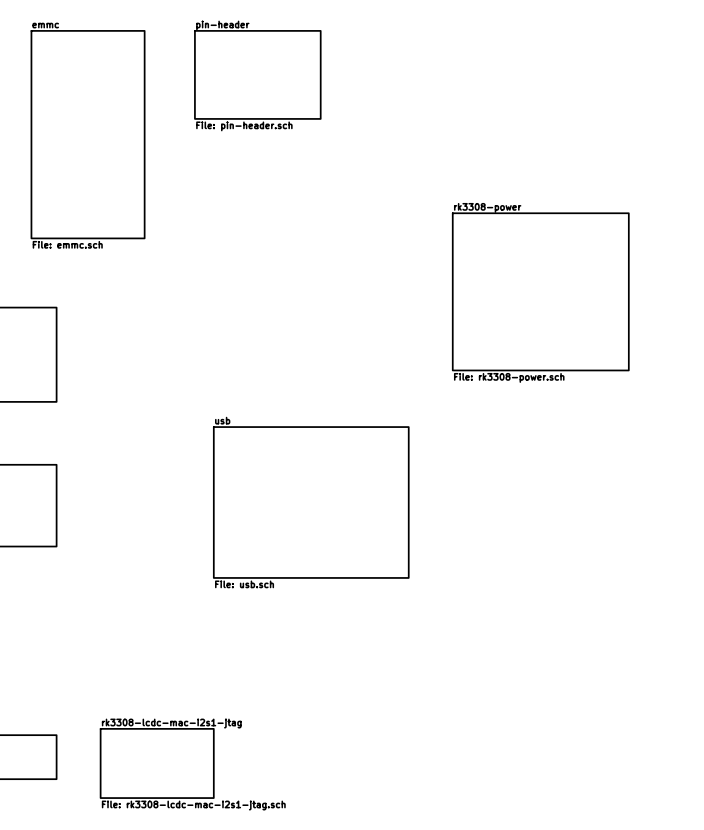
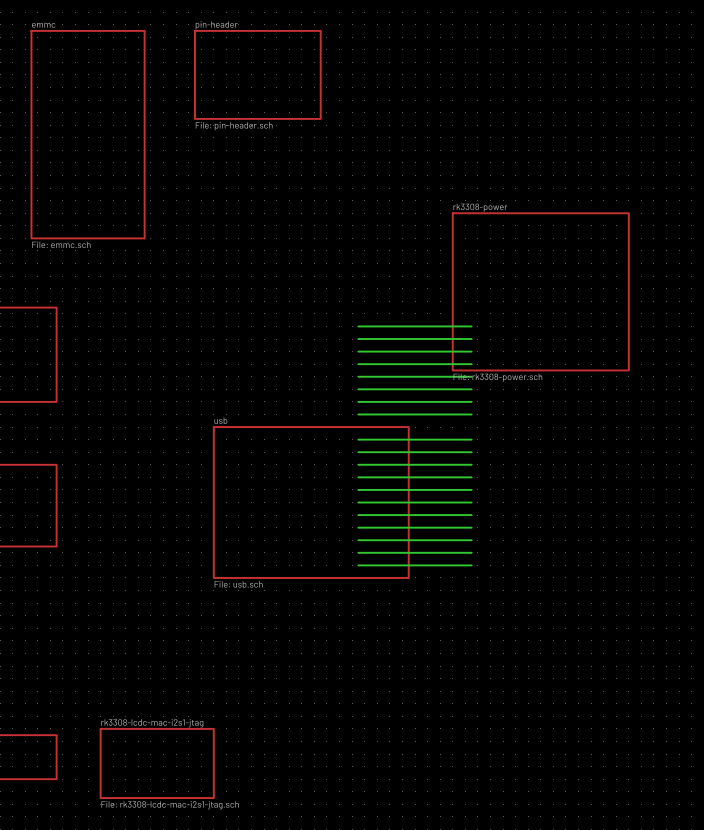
wire: none -> (358, 326) (471, 326)
wire: none -> (358, 339) (471, 339)
wire: none -> (358, 351) (471, 351)
wire: none -> (358, 364) (471, 364)
wire: none -> (358, 376) (471, 376)
wire: none -> (358, 389) (471, 389)
wire: none -> (358, 401) (471, 401)
wire: none -> (358, 414) (471, 414)
wire: none -> (358, 439) (471, 439)
wire: none -> (358, 452) (471, 452)
wire: none -> (358, 464) (471, 464)
wire: none -> (358, 477) (471, 477)
wire: none -> (358, 489) (471, 489)
wire: none -> (358, 502) (471, 502)
wire: none -> (358, 515) (471, 515)
wire: none -> (358, 527) (471, 527)
wire: none -> (358, 540) (471, 540)
wire: none -> (358, 552) (471, 552)
wire: none -> (358, 565) (471, 565)

